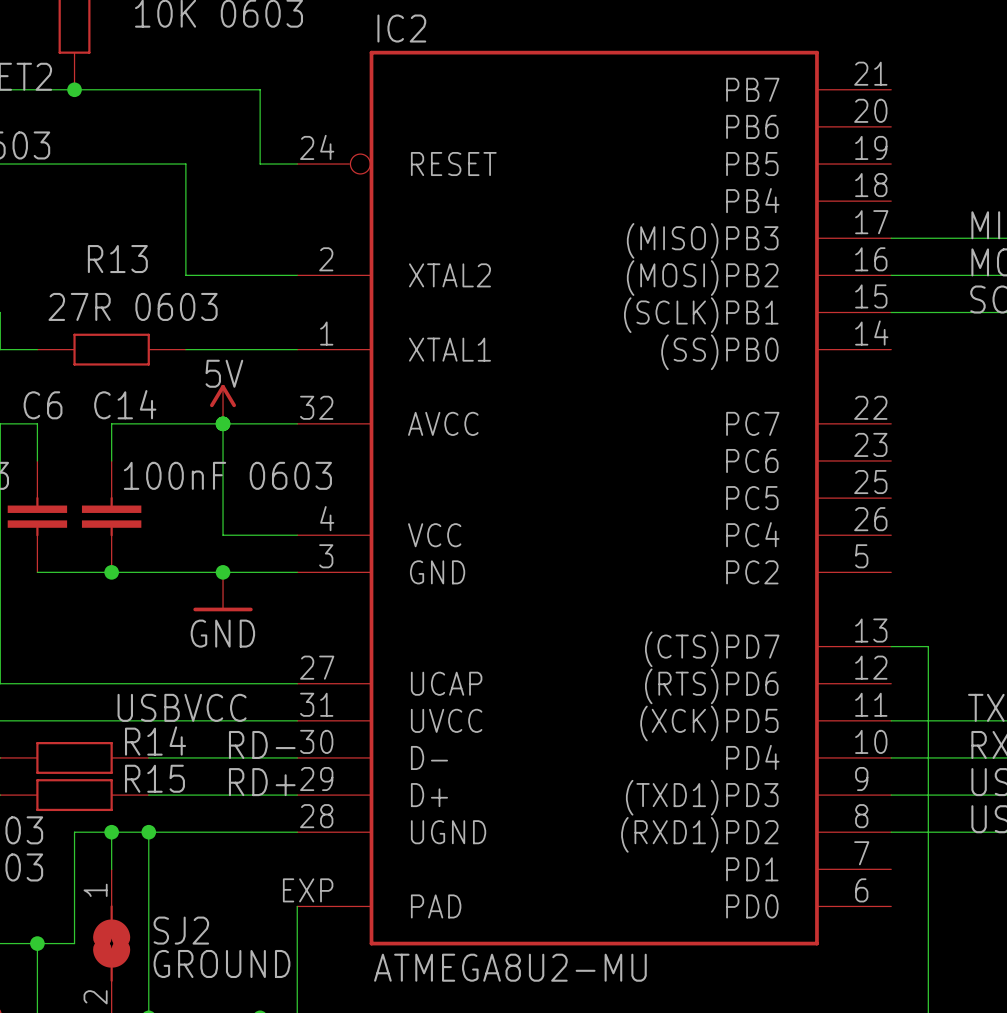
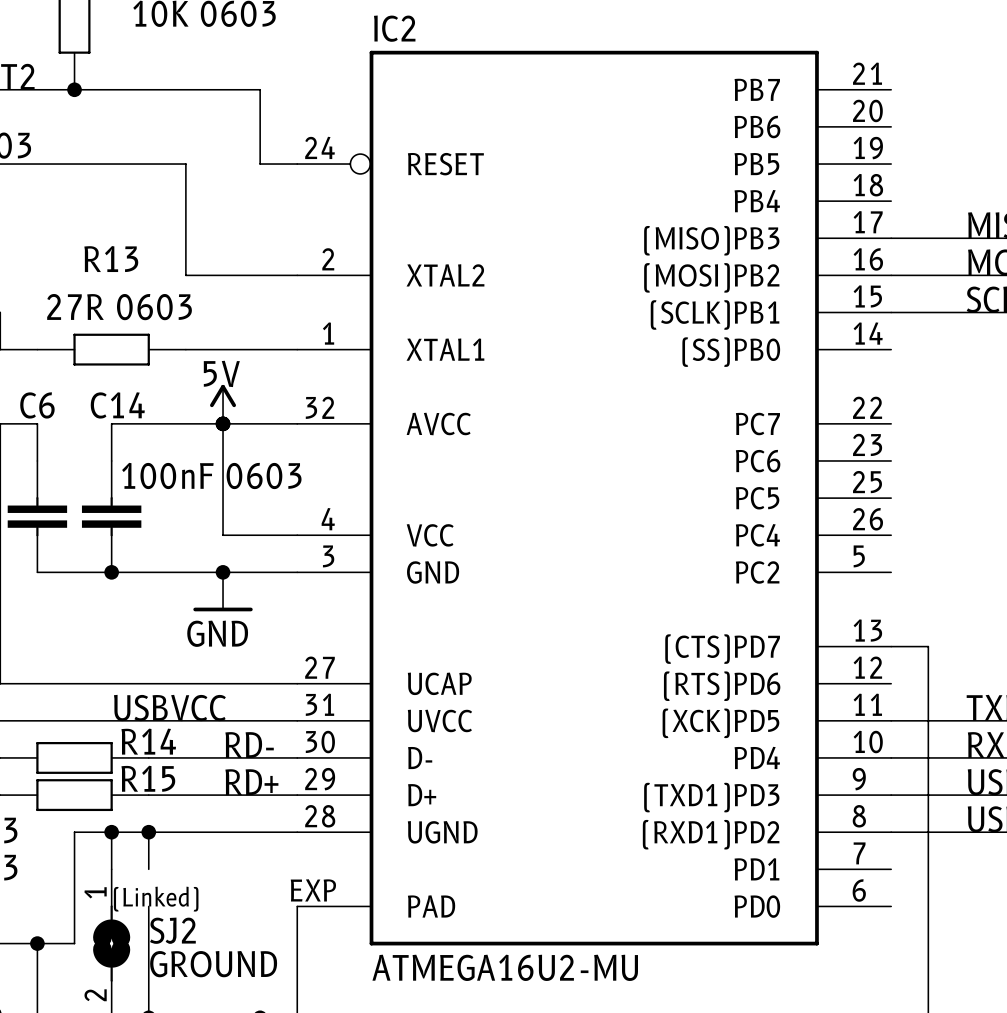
wire: (148, 869) (148, 906) -> none
text: none -> (Linked) (156, 899)
IC2 value: ATMEGA8U2-MU (510, 967) -> ATMEGA16U2-MU (505, 967)

